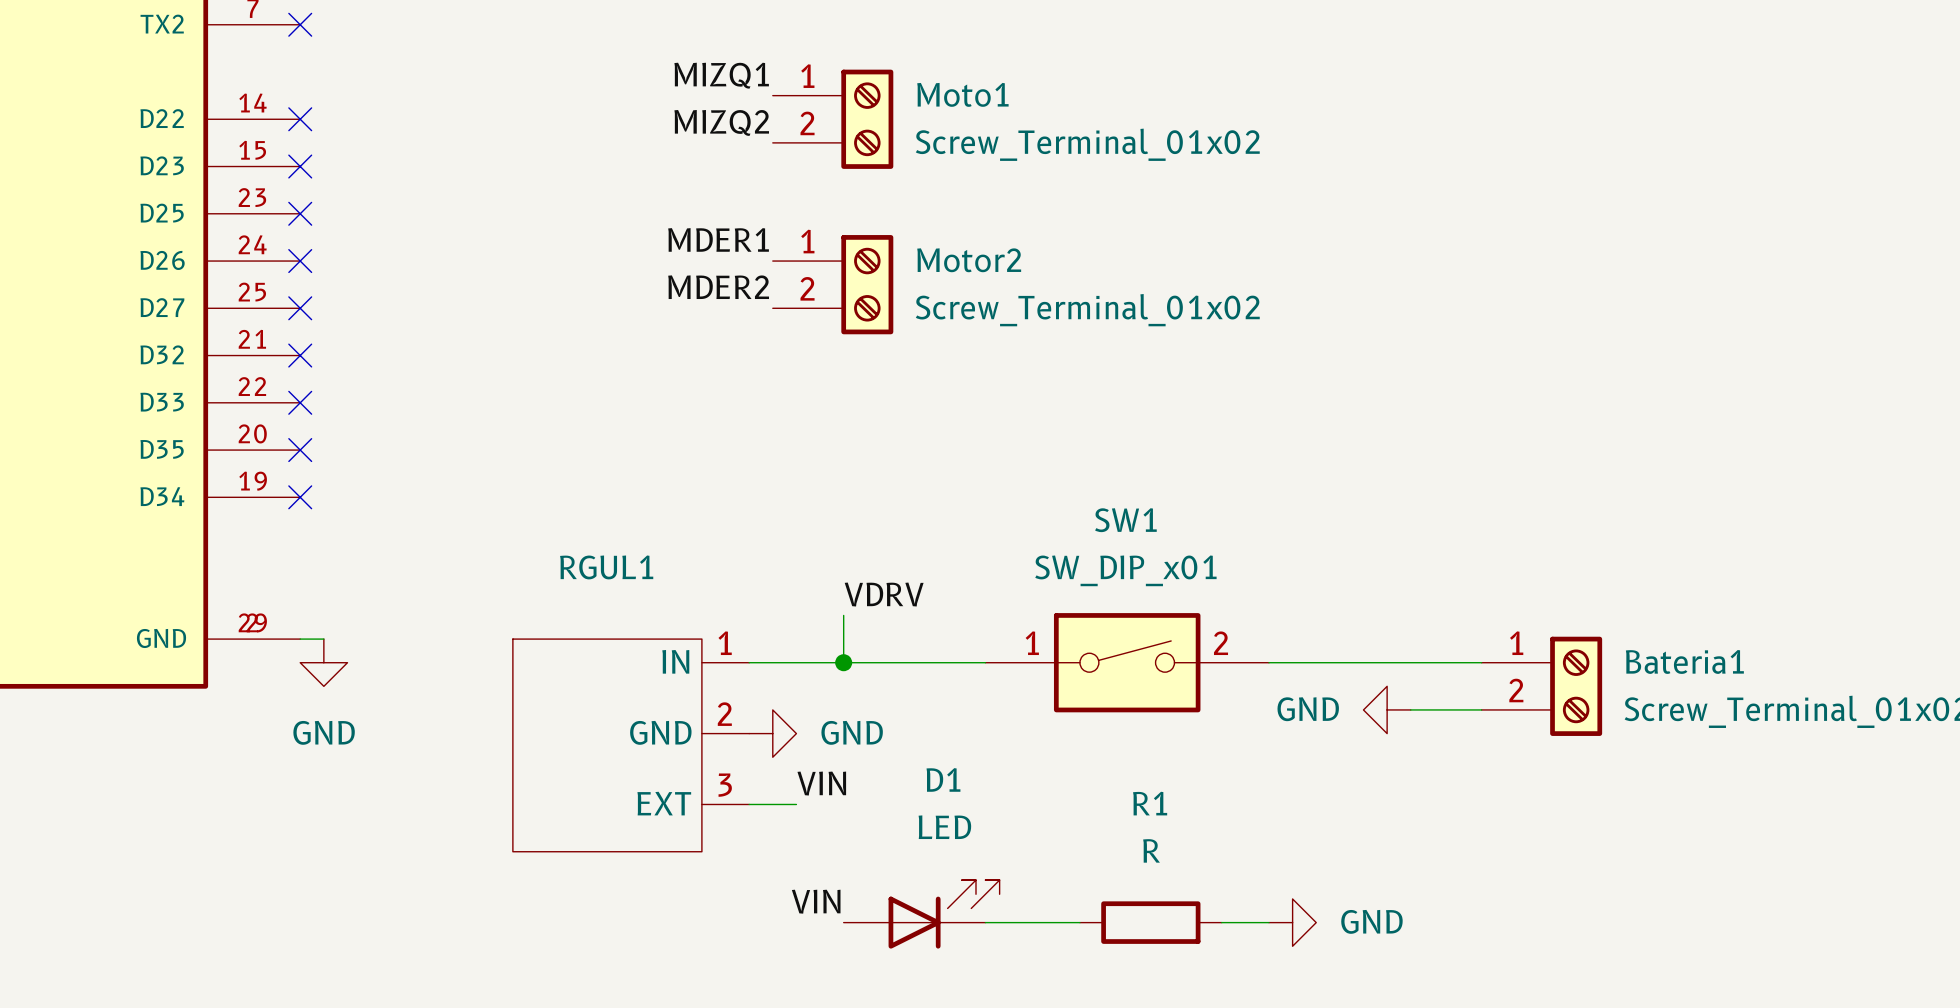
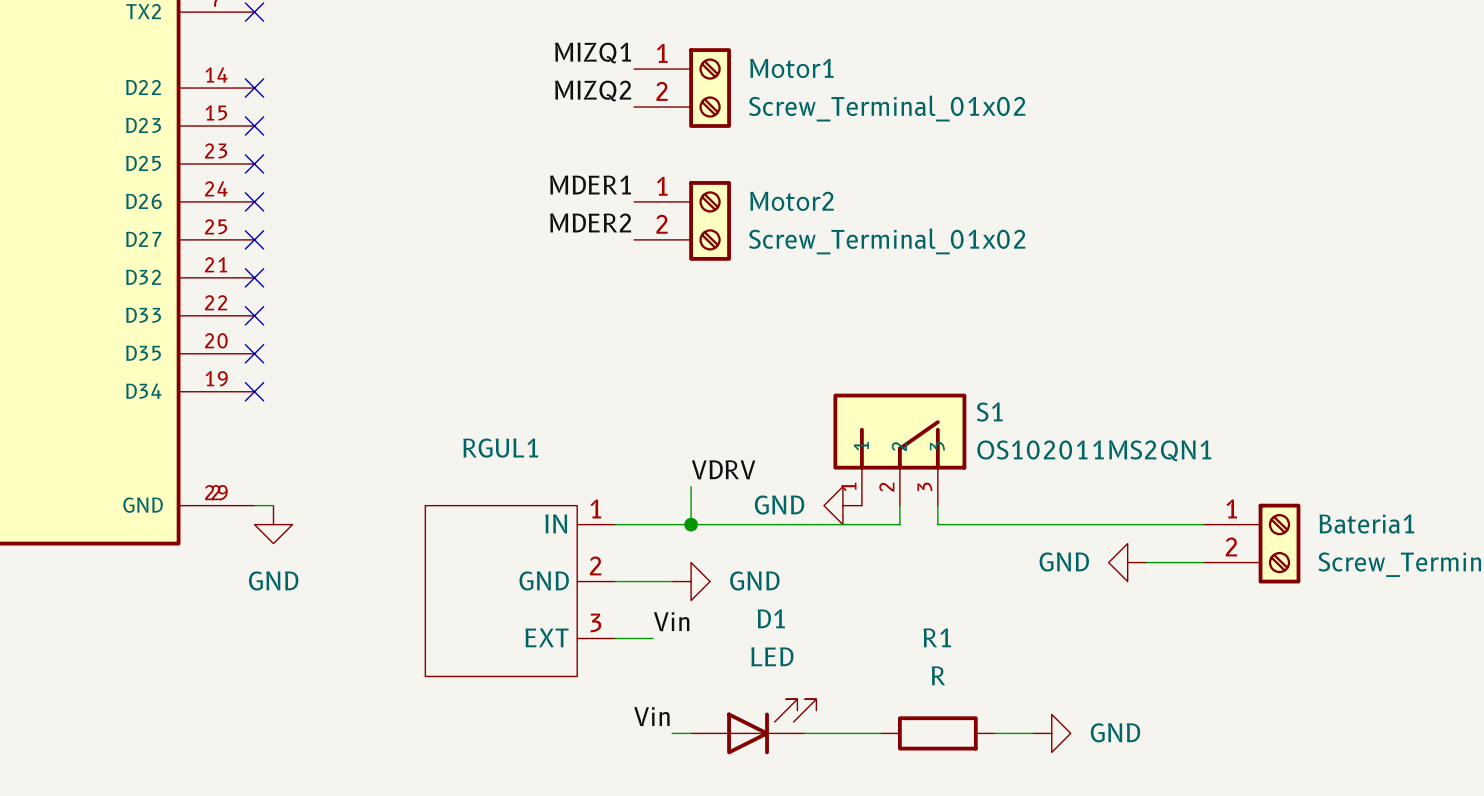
Moto1 name: Moto1 (962, 94) -> Motor1 (791, 68)
S1: none -> OS102011MS2QN1 (899, 449)
power symbol: none -> GND (842, 505)
SW1: SW_DIP_x01 (1127, 662) -> none
wire: none -> (615, 581) (672, 581)
power symbol position: GND (772, 733) -> GND (691, 581)
label: VIN (821, 783) -> Vin (671, 621)
label: none -> Vin (651, 716)
label: VIN (816, 901) -> none
wire: none -> (672, 733) (691, 733)

